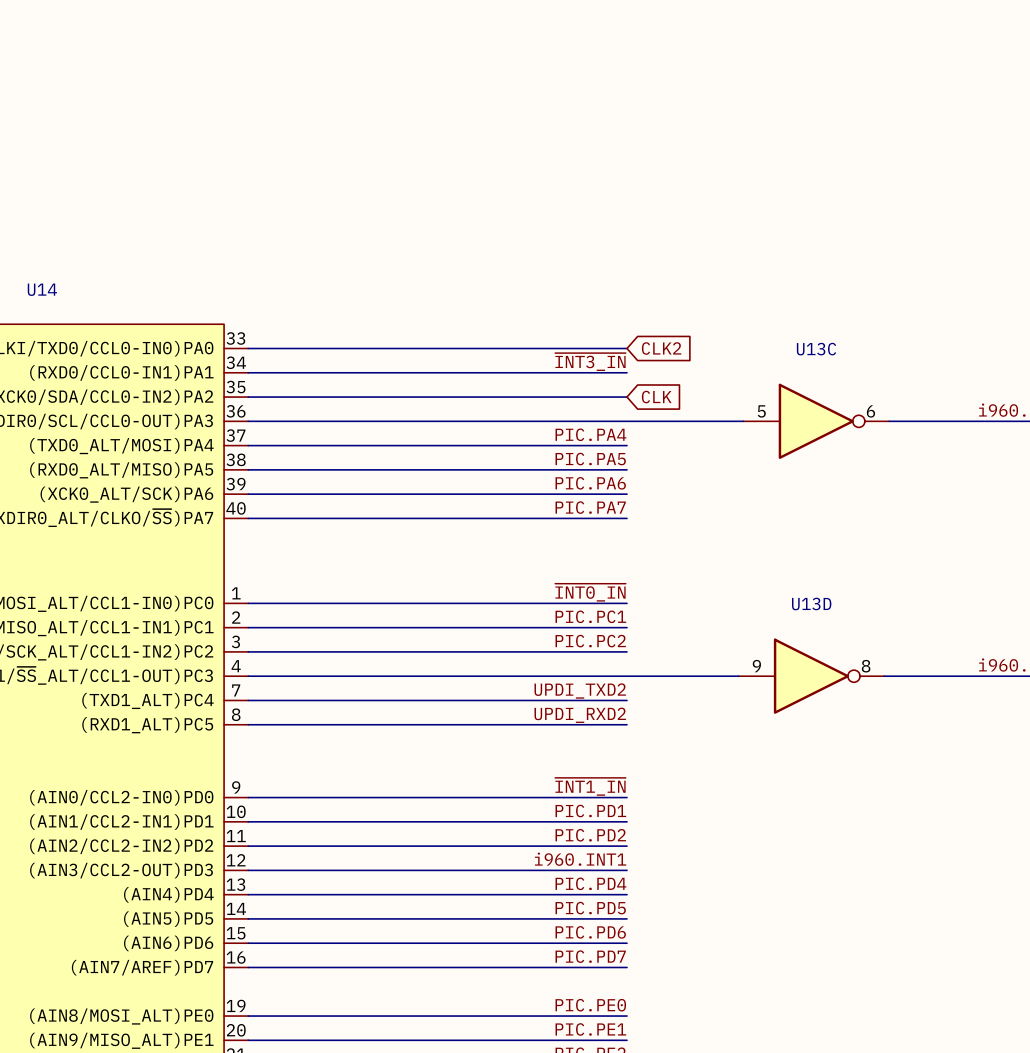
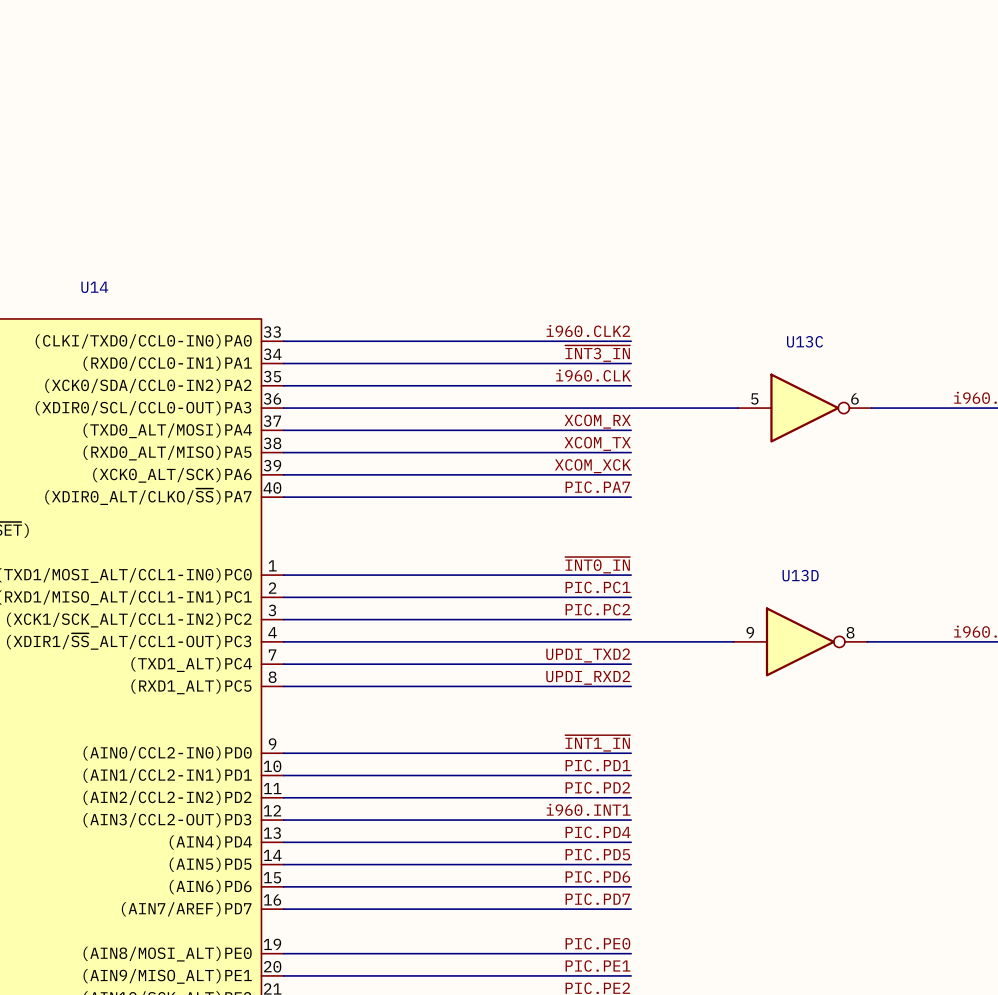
label: none -> i960.CLK2 (588, 331)
global label: CLK2 (661, 348) -> none
label: none -> i960.CLK (593, 375)
global label: CLK (656, 397) -> none
label: PIC.PA4 (590, 434) -> XCOM_RX (597, 421)
label: PIC.PA5 (590, 459) -> XCOM_TX (597, 443)
label: PIC.PA6 (590, 483) -> XCOM_XCK (592, 466)

